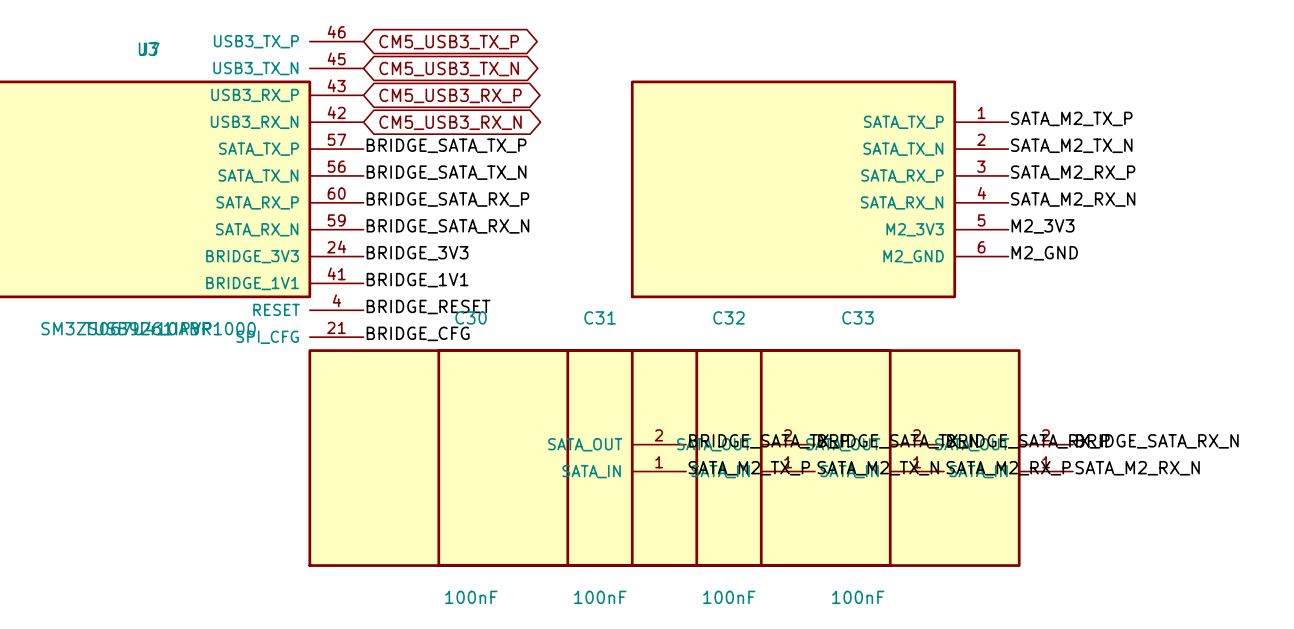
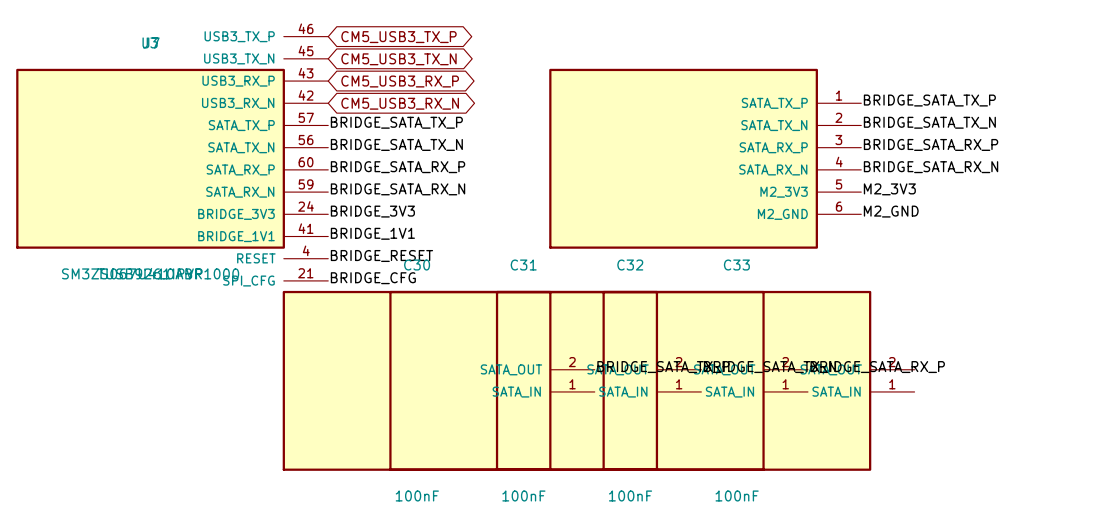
label: SATA_M2_TX_P (1071, 118) -> BRIDGE_SATA_TX_P (929, 100)
label: SATA_M2_TX_N (1071, 145) -> BRIDGE_SATA_TX_N (929, 122)
label: SATA_M2_RX_P (1073, 172) -> BRIDGE_SATA_RX_P (931, 144)
label: SATA_M2_RX_N (1073, 199) -> BRIDGE_SATA_RX_N (931, 167)
label: BRIDGE_SATA_RX_N (1157, 441) -> none
label: SATA_M2_TX_P (749, 468) -> none
label: SATA_M2_TX_N (878, 468) -> none
label: SATA_M2_RX_P (1008, 468) -> none
label: SATA_M2_RX_N (1137, 468) -> none

